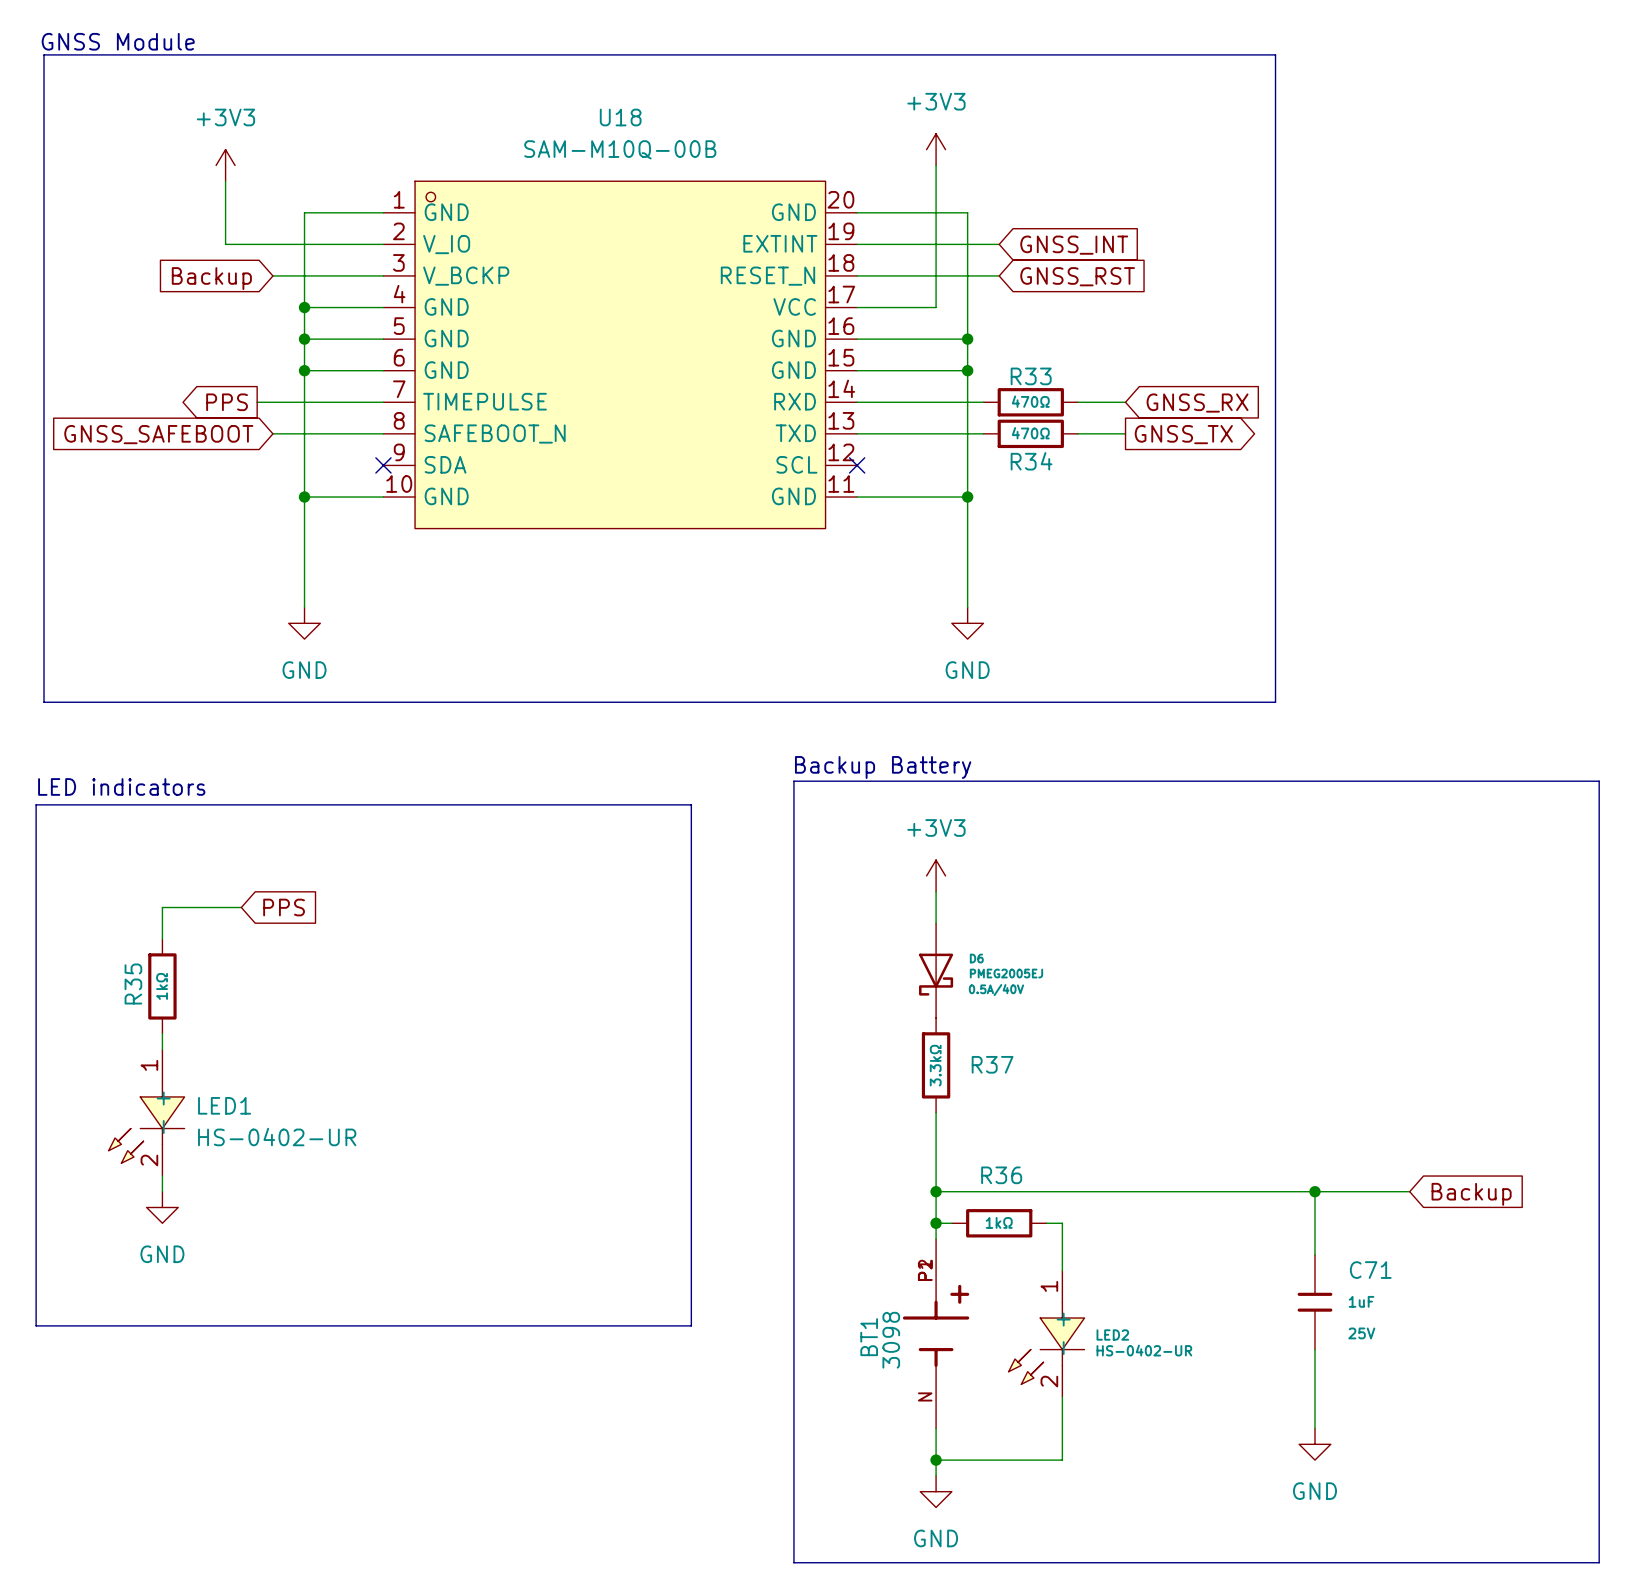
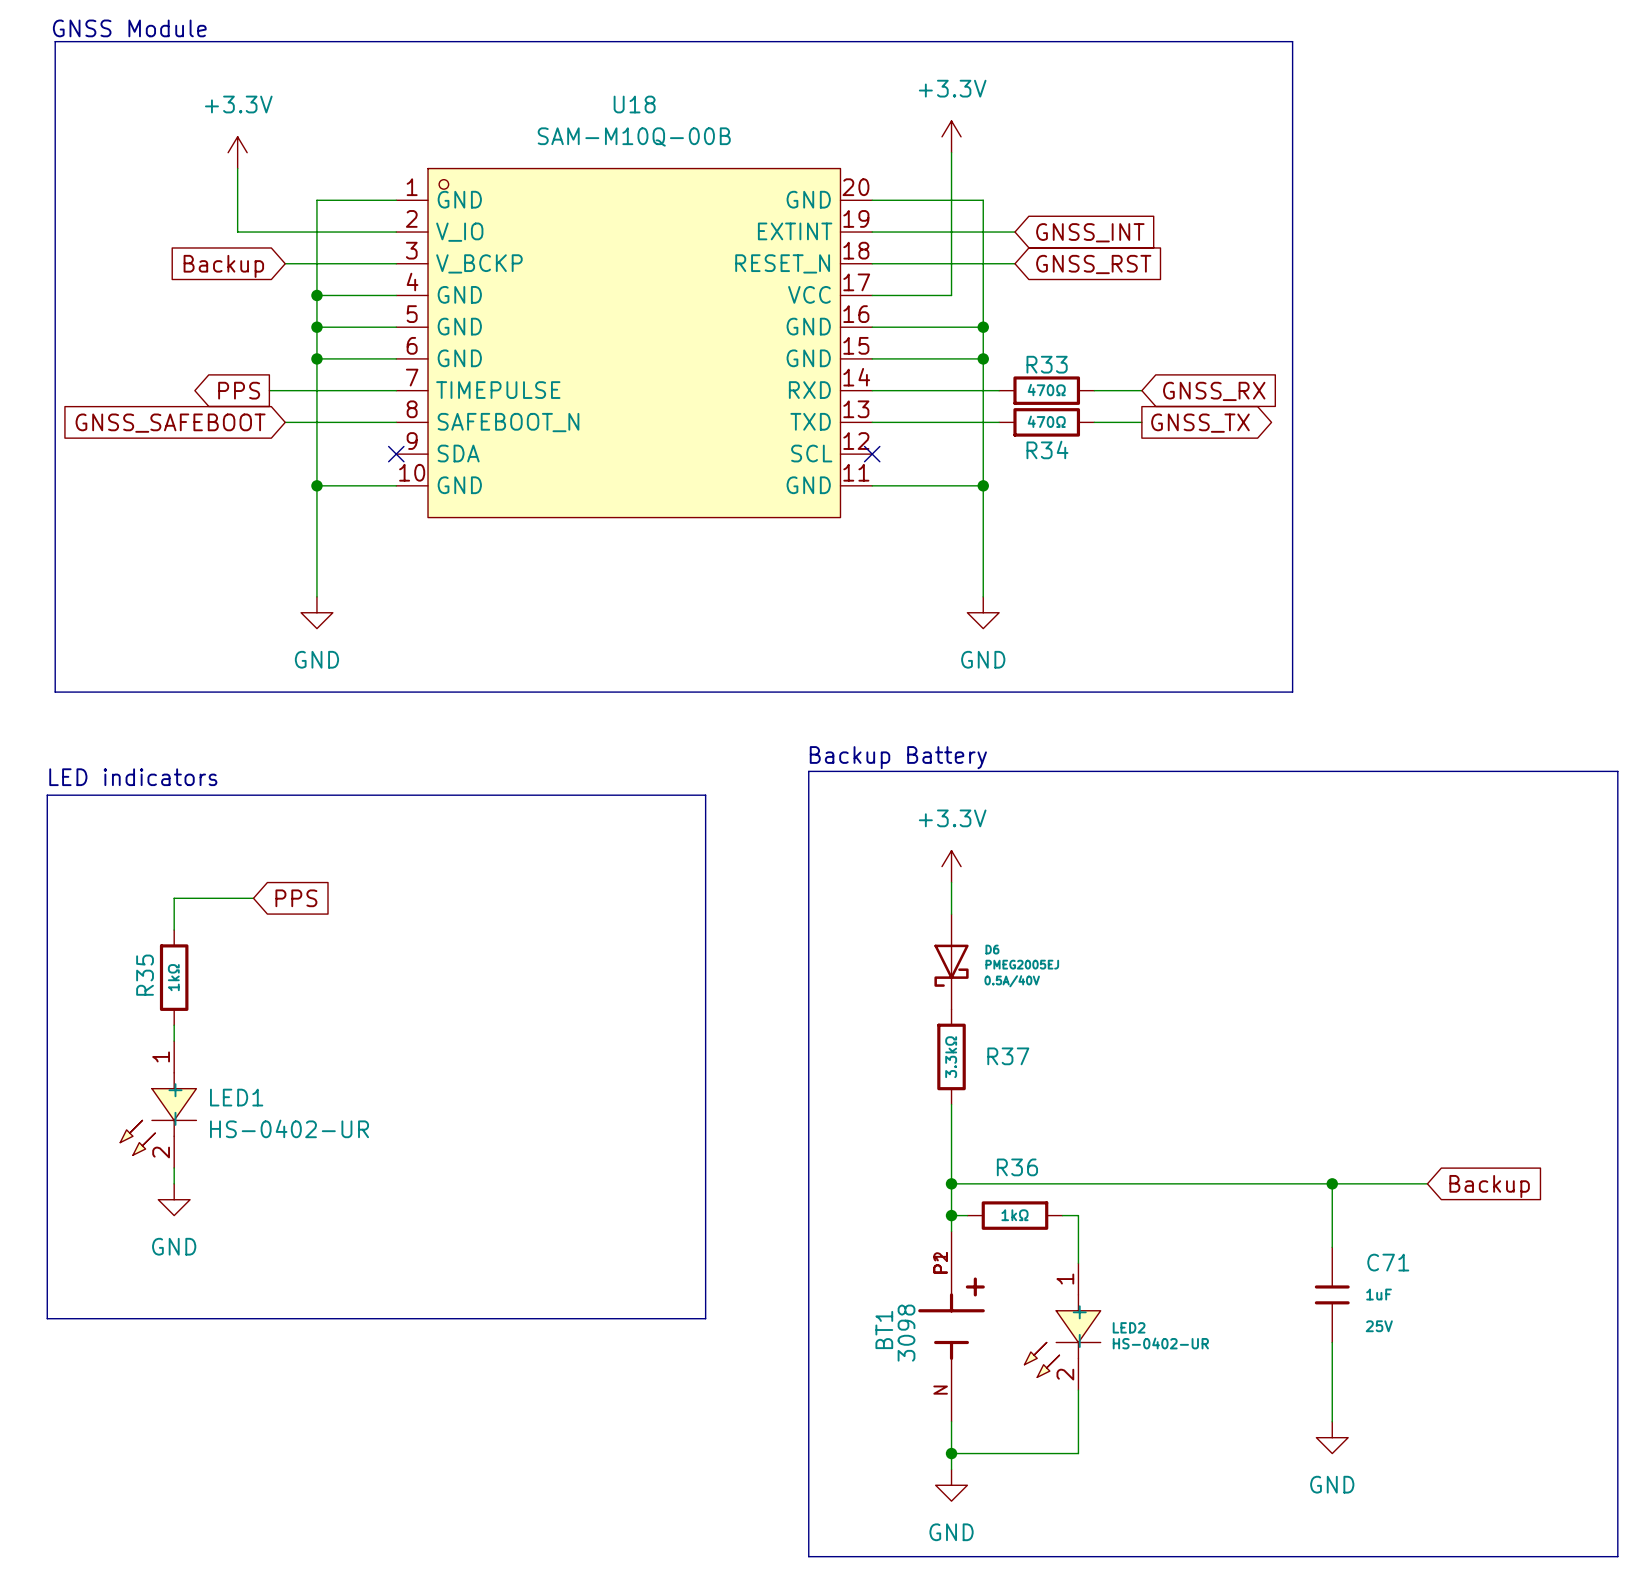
power symbol: +3V3 (936, 149) -> +3.3V (951, 136)
power symbol: +3V3 (225, 165) -> +3.3V (237, 152)
power symbol: +3V3 (936, 875) -> +3.3V (951, 866)

